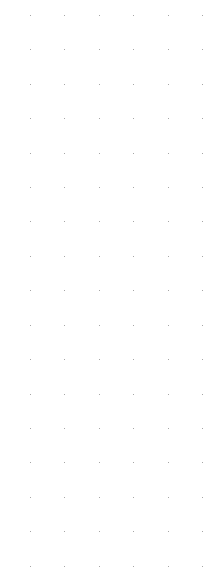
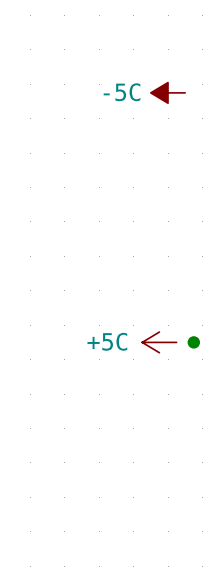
power symbol: none -> -5C (168, 92)
power symbol: none -> +5C (159, 342)
junction: none -> (193, 342)

